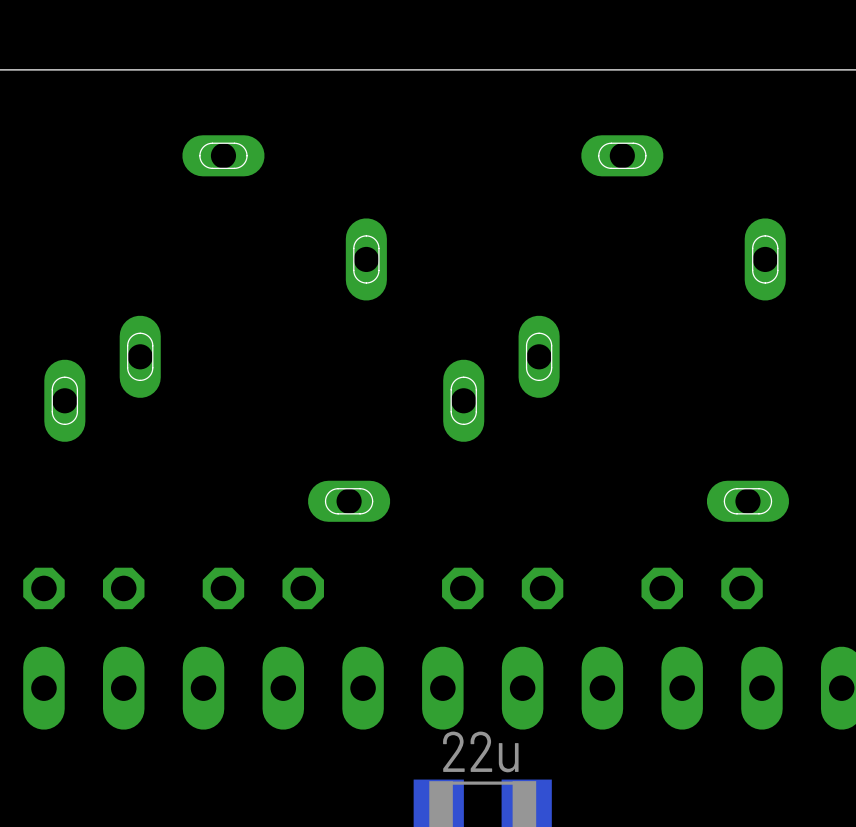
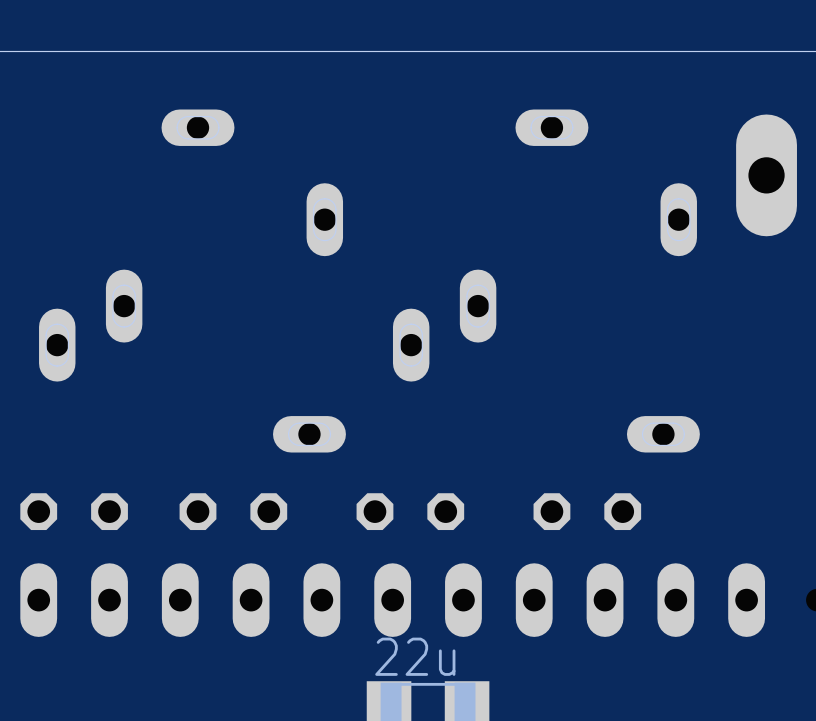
part position: (502, 588) -> (410, 511)
part position: (702, 588) -> (587, 511)

